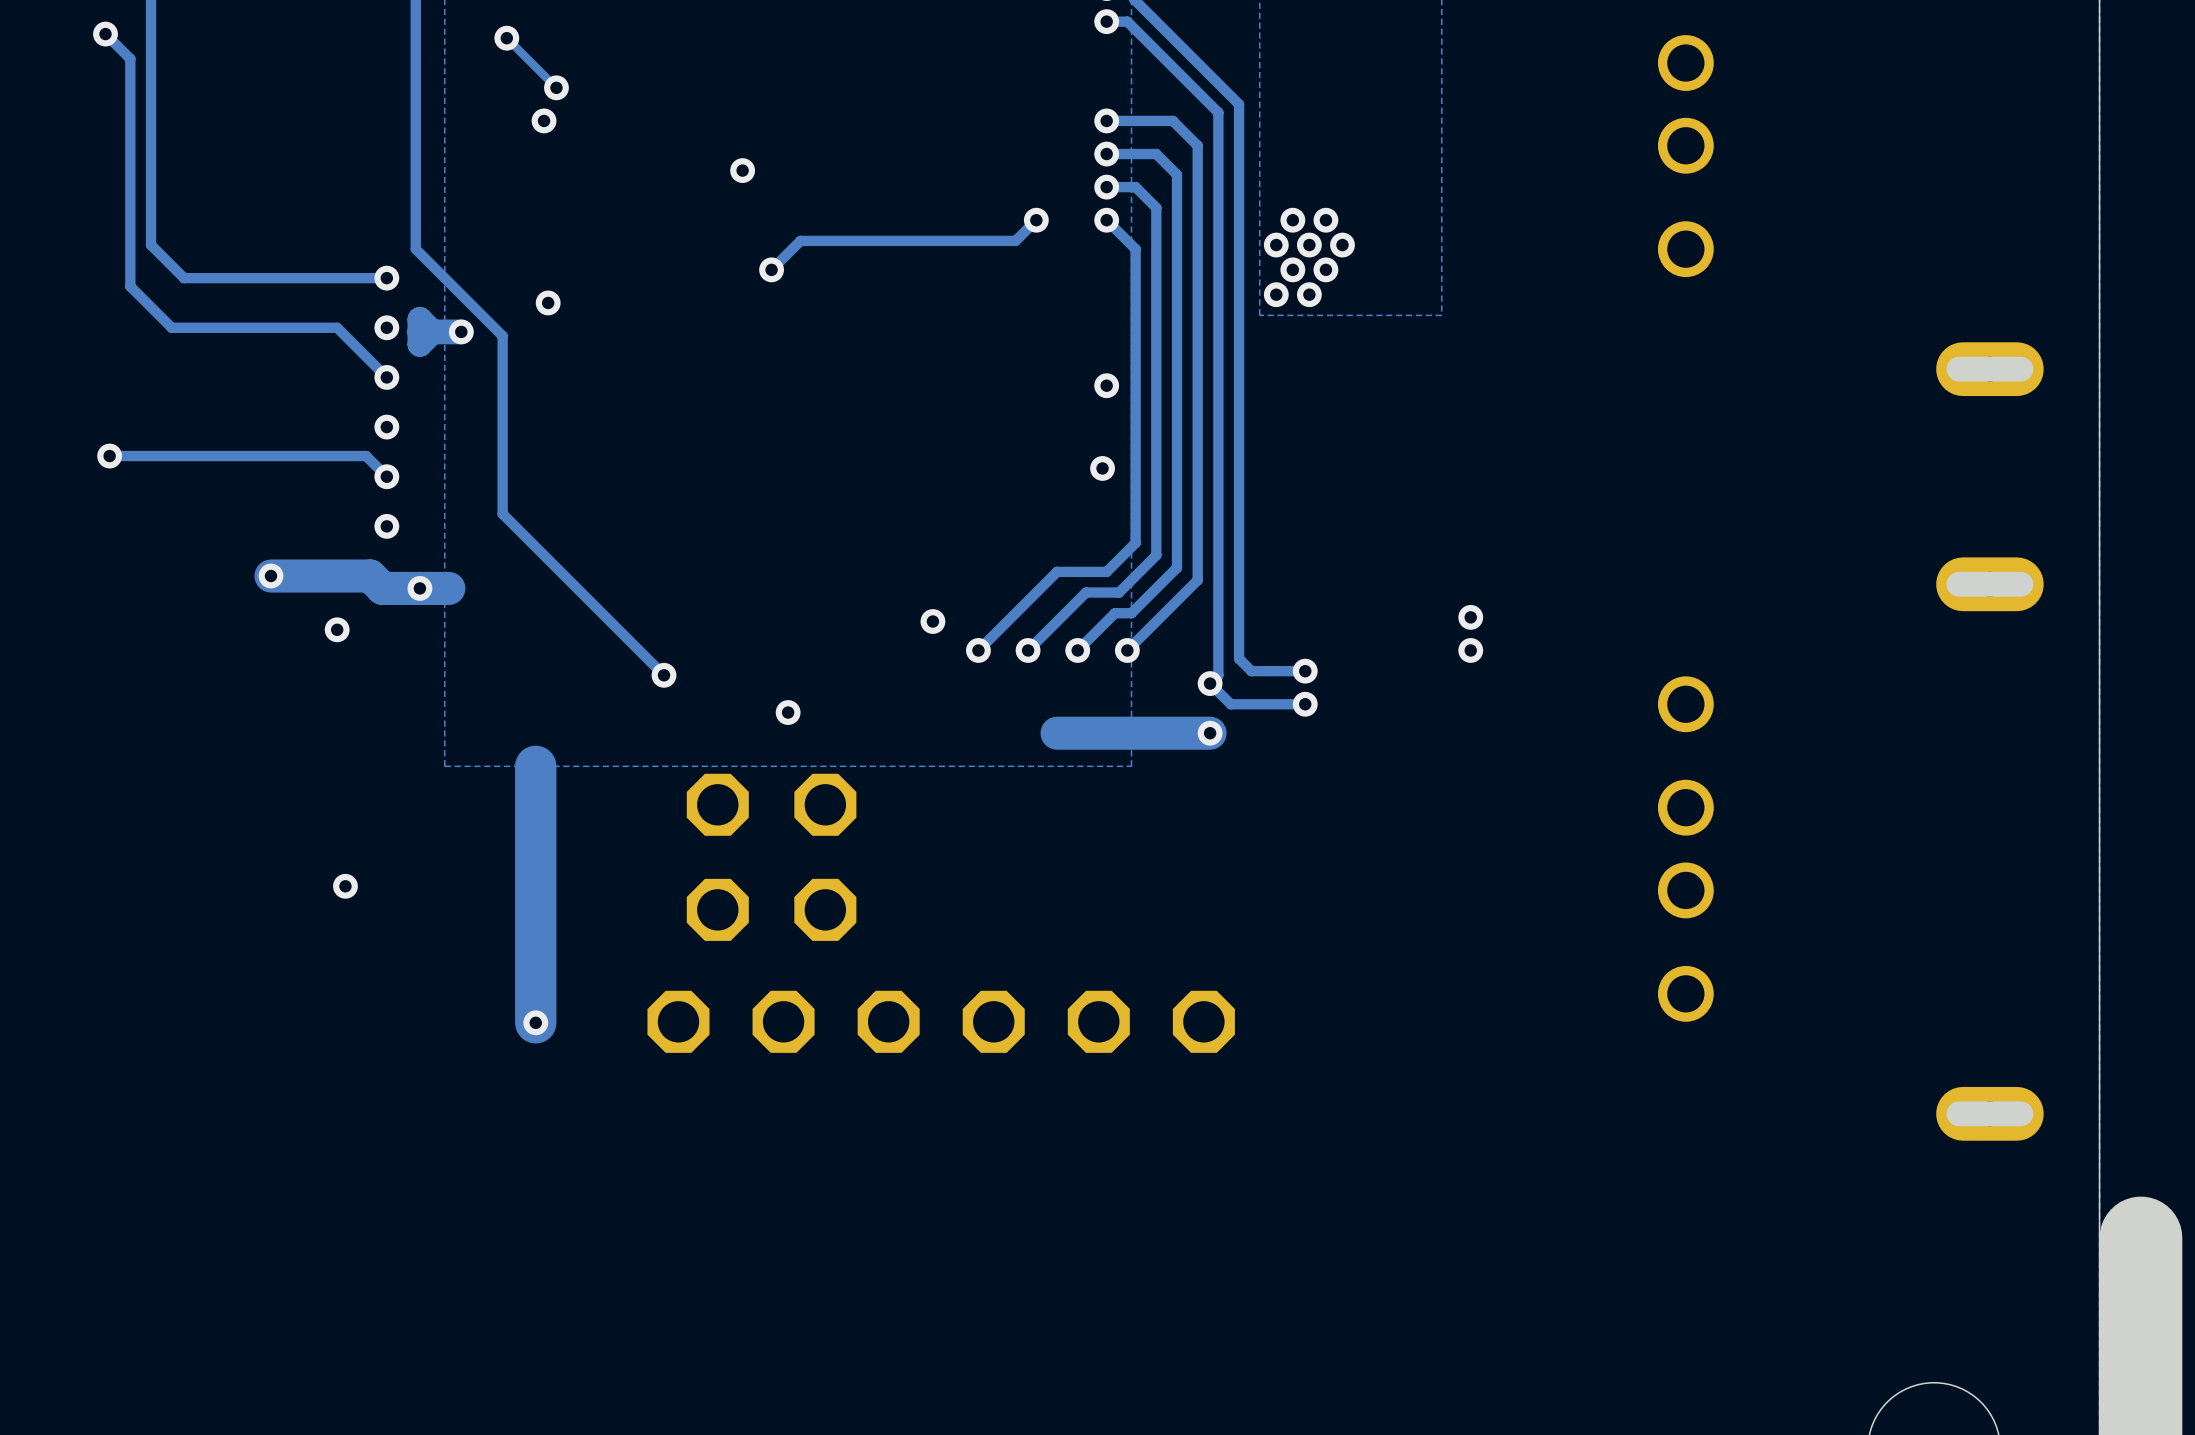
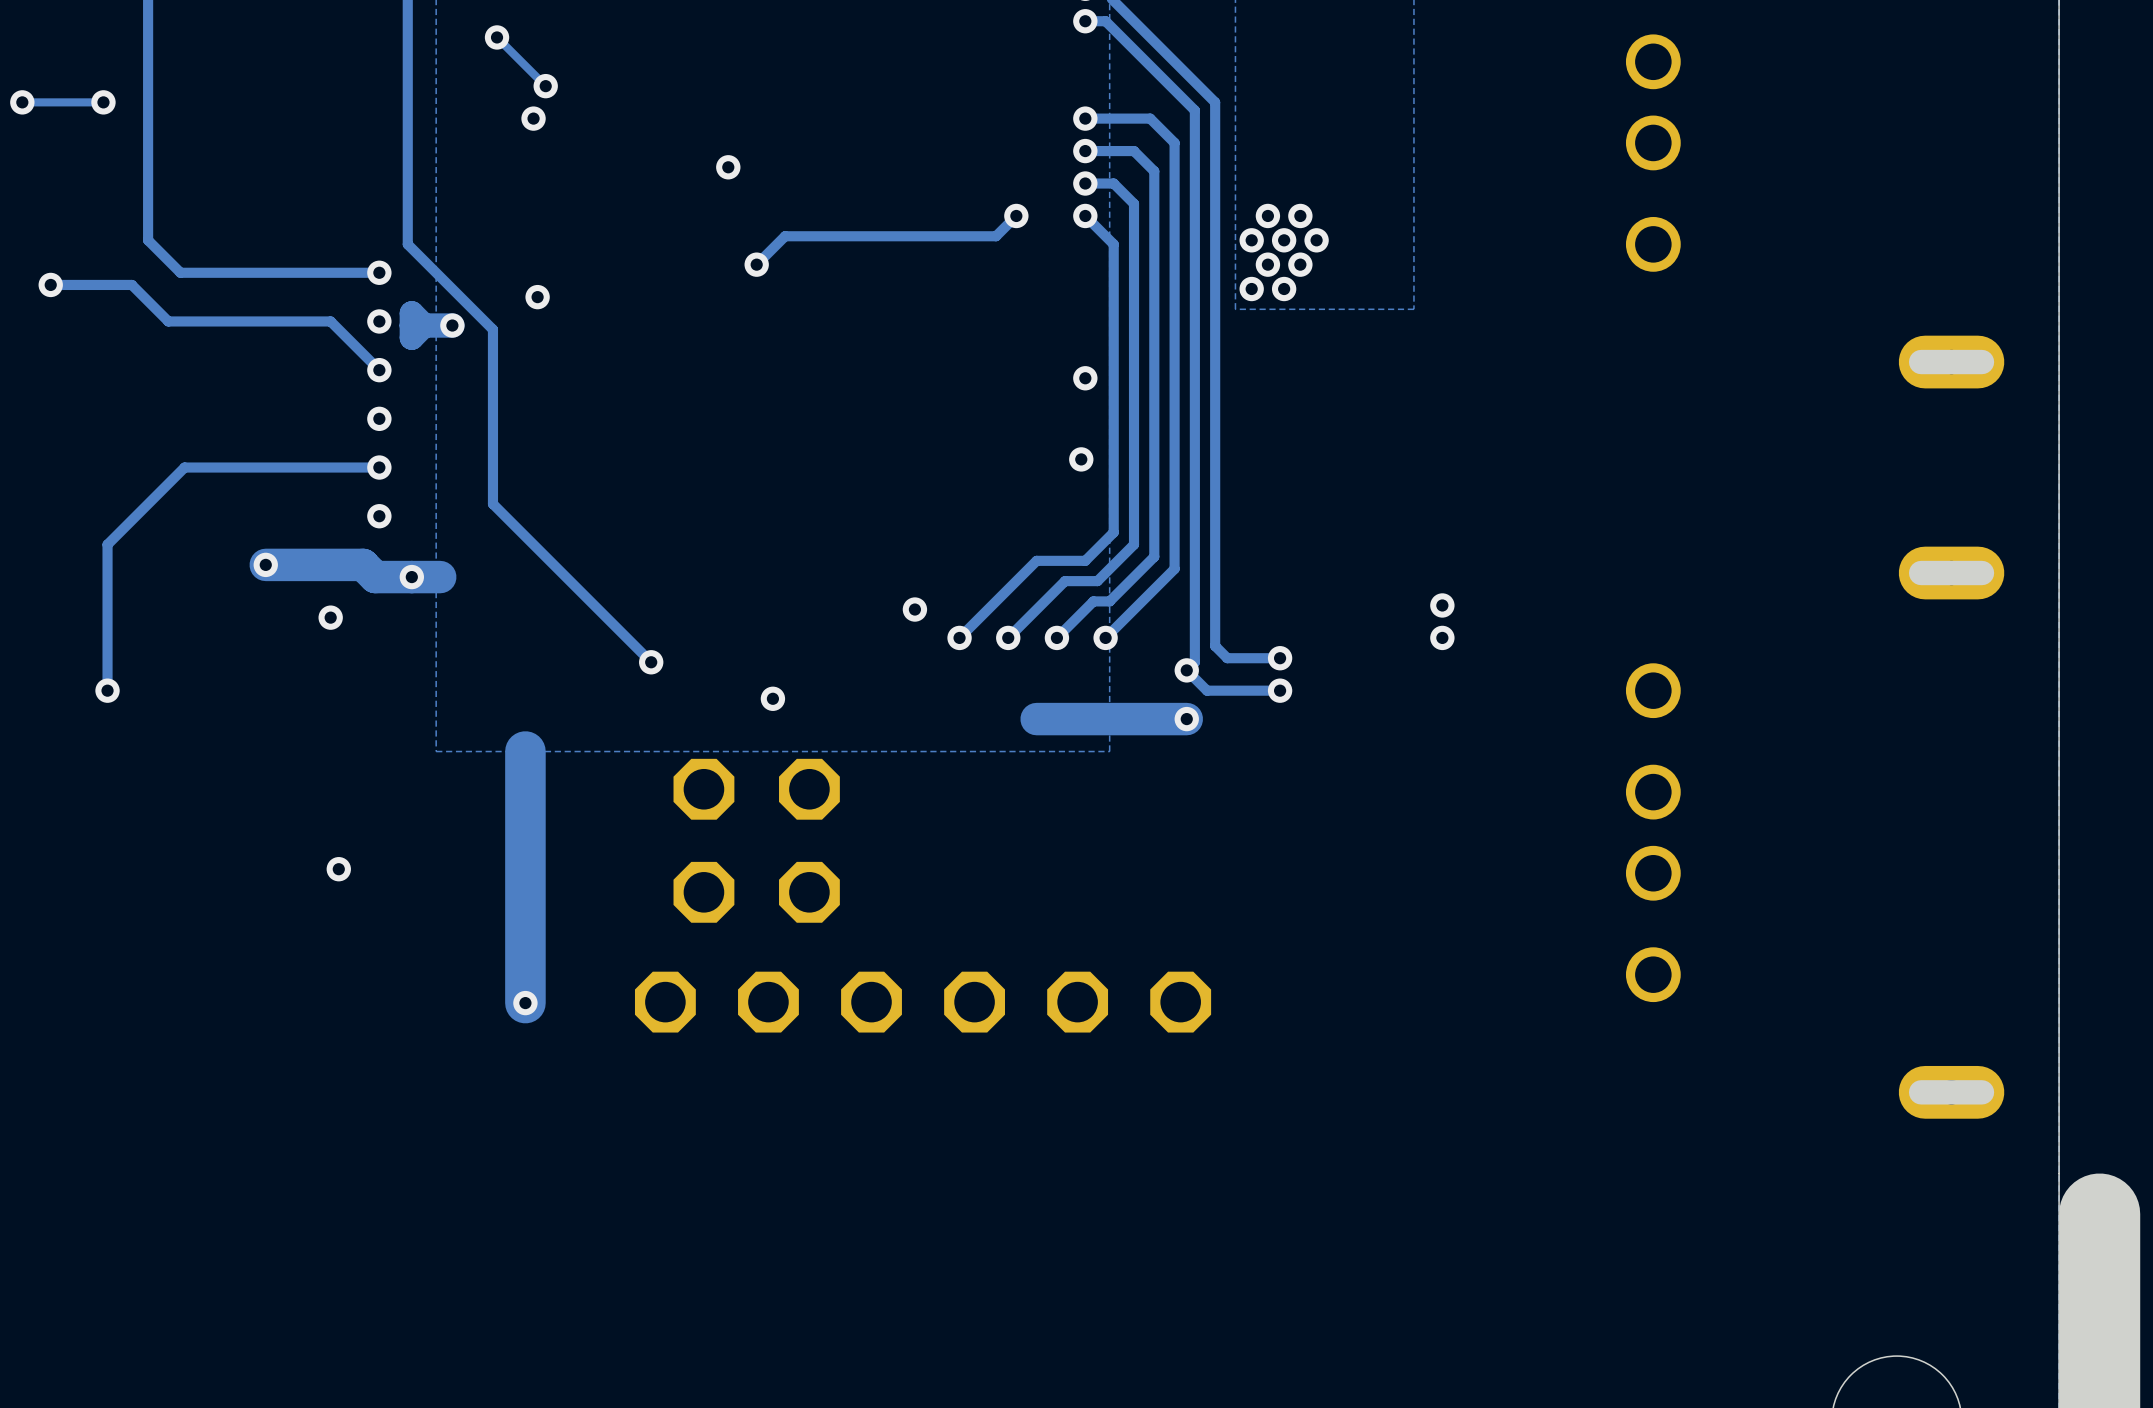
track: (105, 34) (130, 58) (130, 286) (134, 290) -> (50, 284) (131, 284)
via: (105, 34) -> none
via: none -> (22, 102)
track: none -> (103, 102) (22, 102)
via: none -> (103, 102)
via: none -> (50, 284)
track: (109, 456) (366, 456) (386, 476) -> (107, 690) (107, 544) (184, 467) (379, 467)
via: (109, 456) -> none
via: none -> (107, 690)

